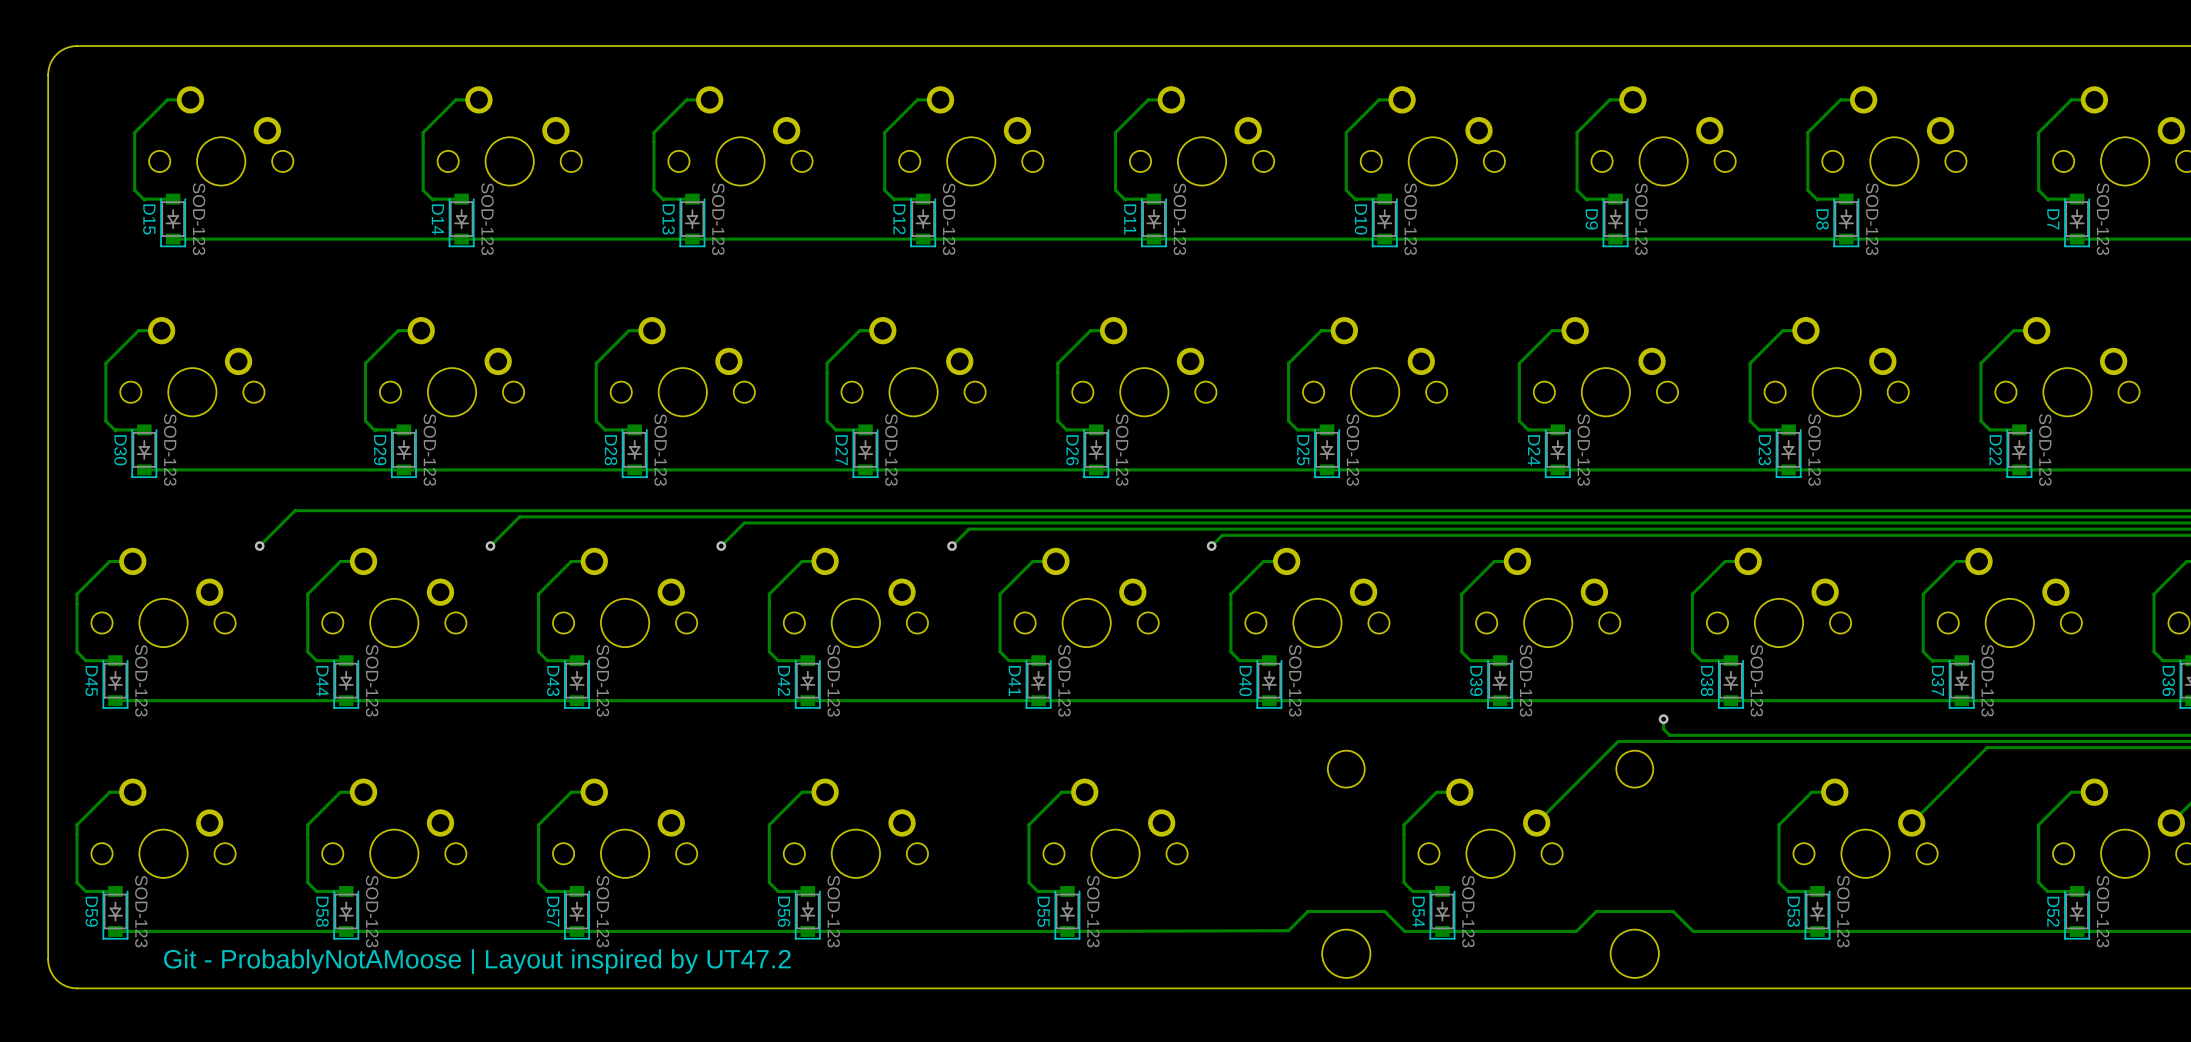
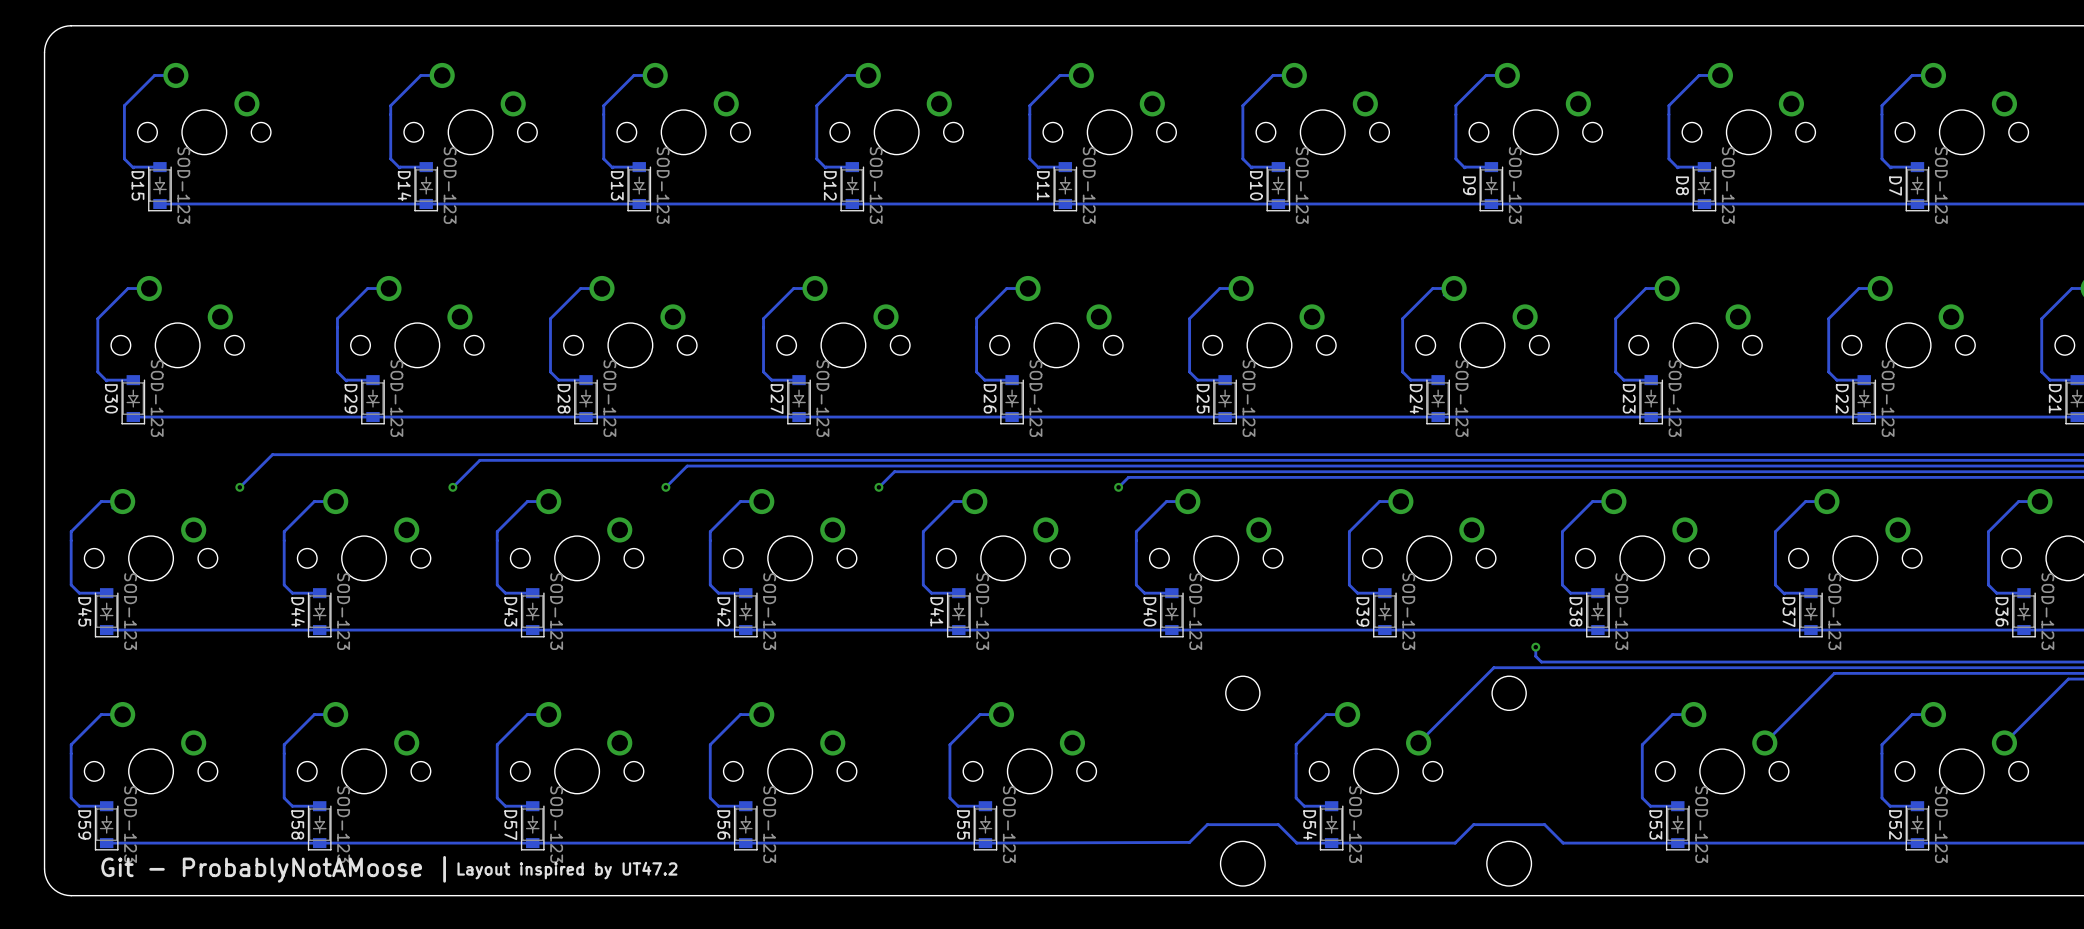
text: none -> Git - ProbablyNotAMoose | (273, 869)
text: none -> Layout inspired by UT47.2 (567, 870)
text: Git - ProbablyNotAMoose | Layout inspired by UT47.2 (477, 961) -> none

